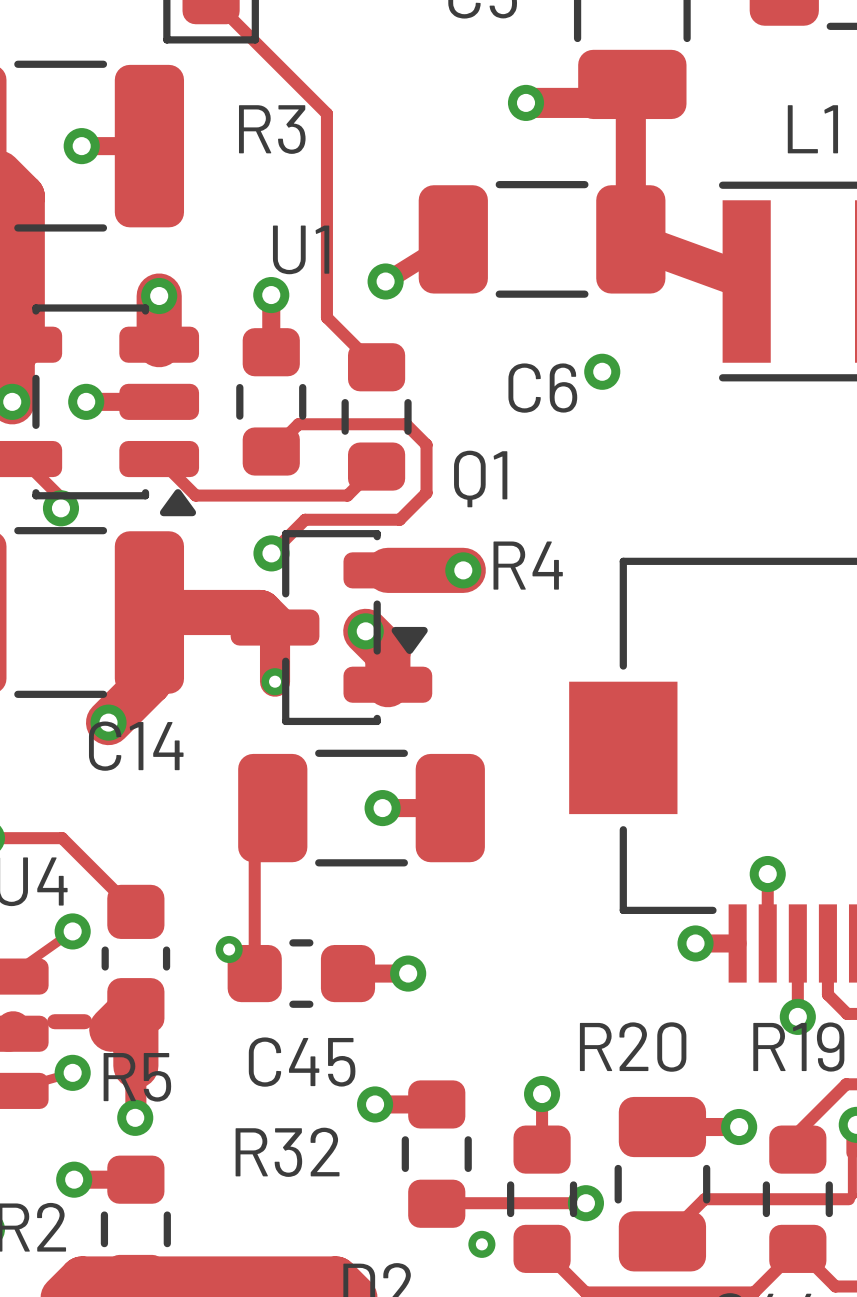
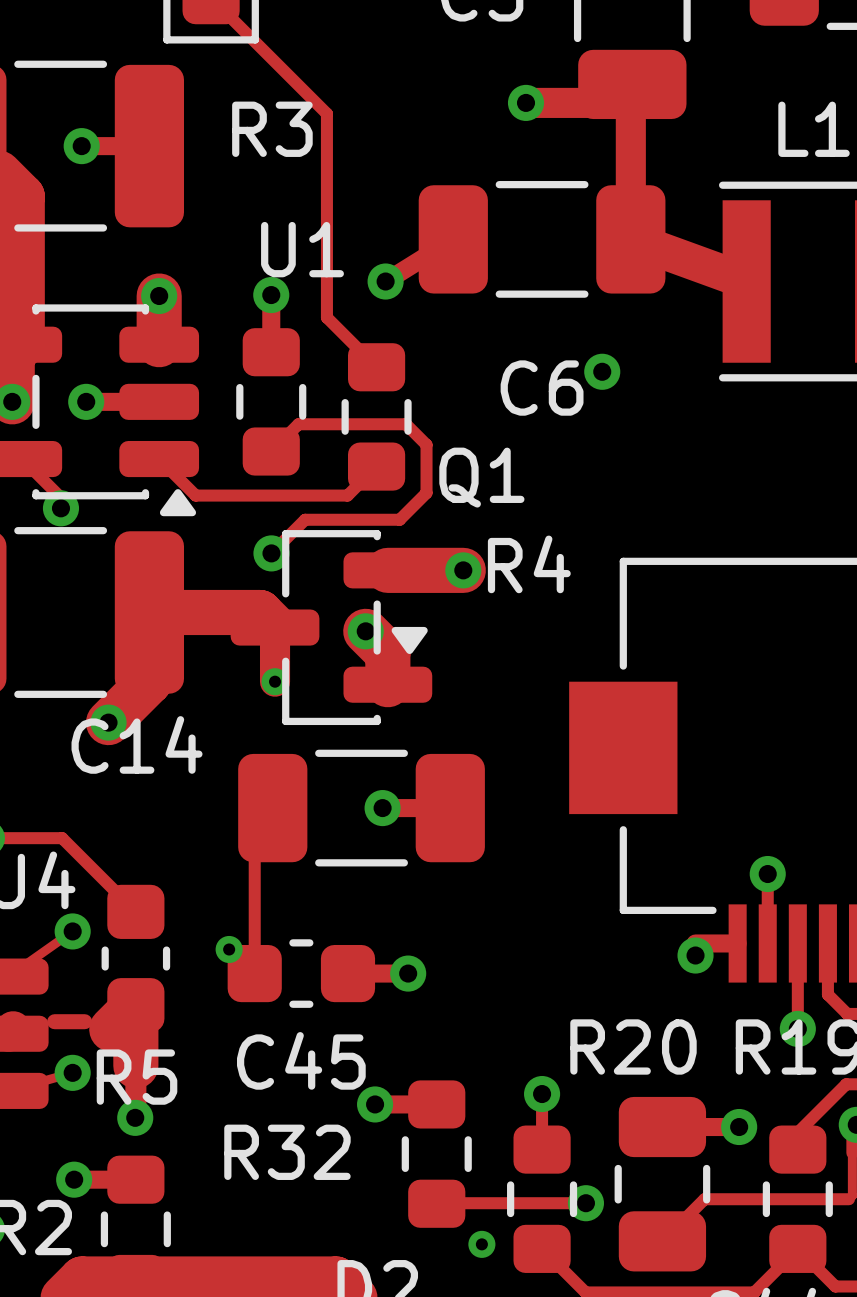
via position: (695, 943) -> (695, 955)
via position: (797, 1016) -> (797, 1028)

